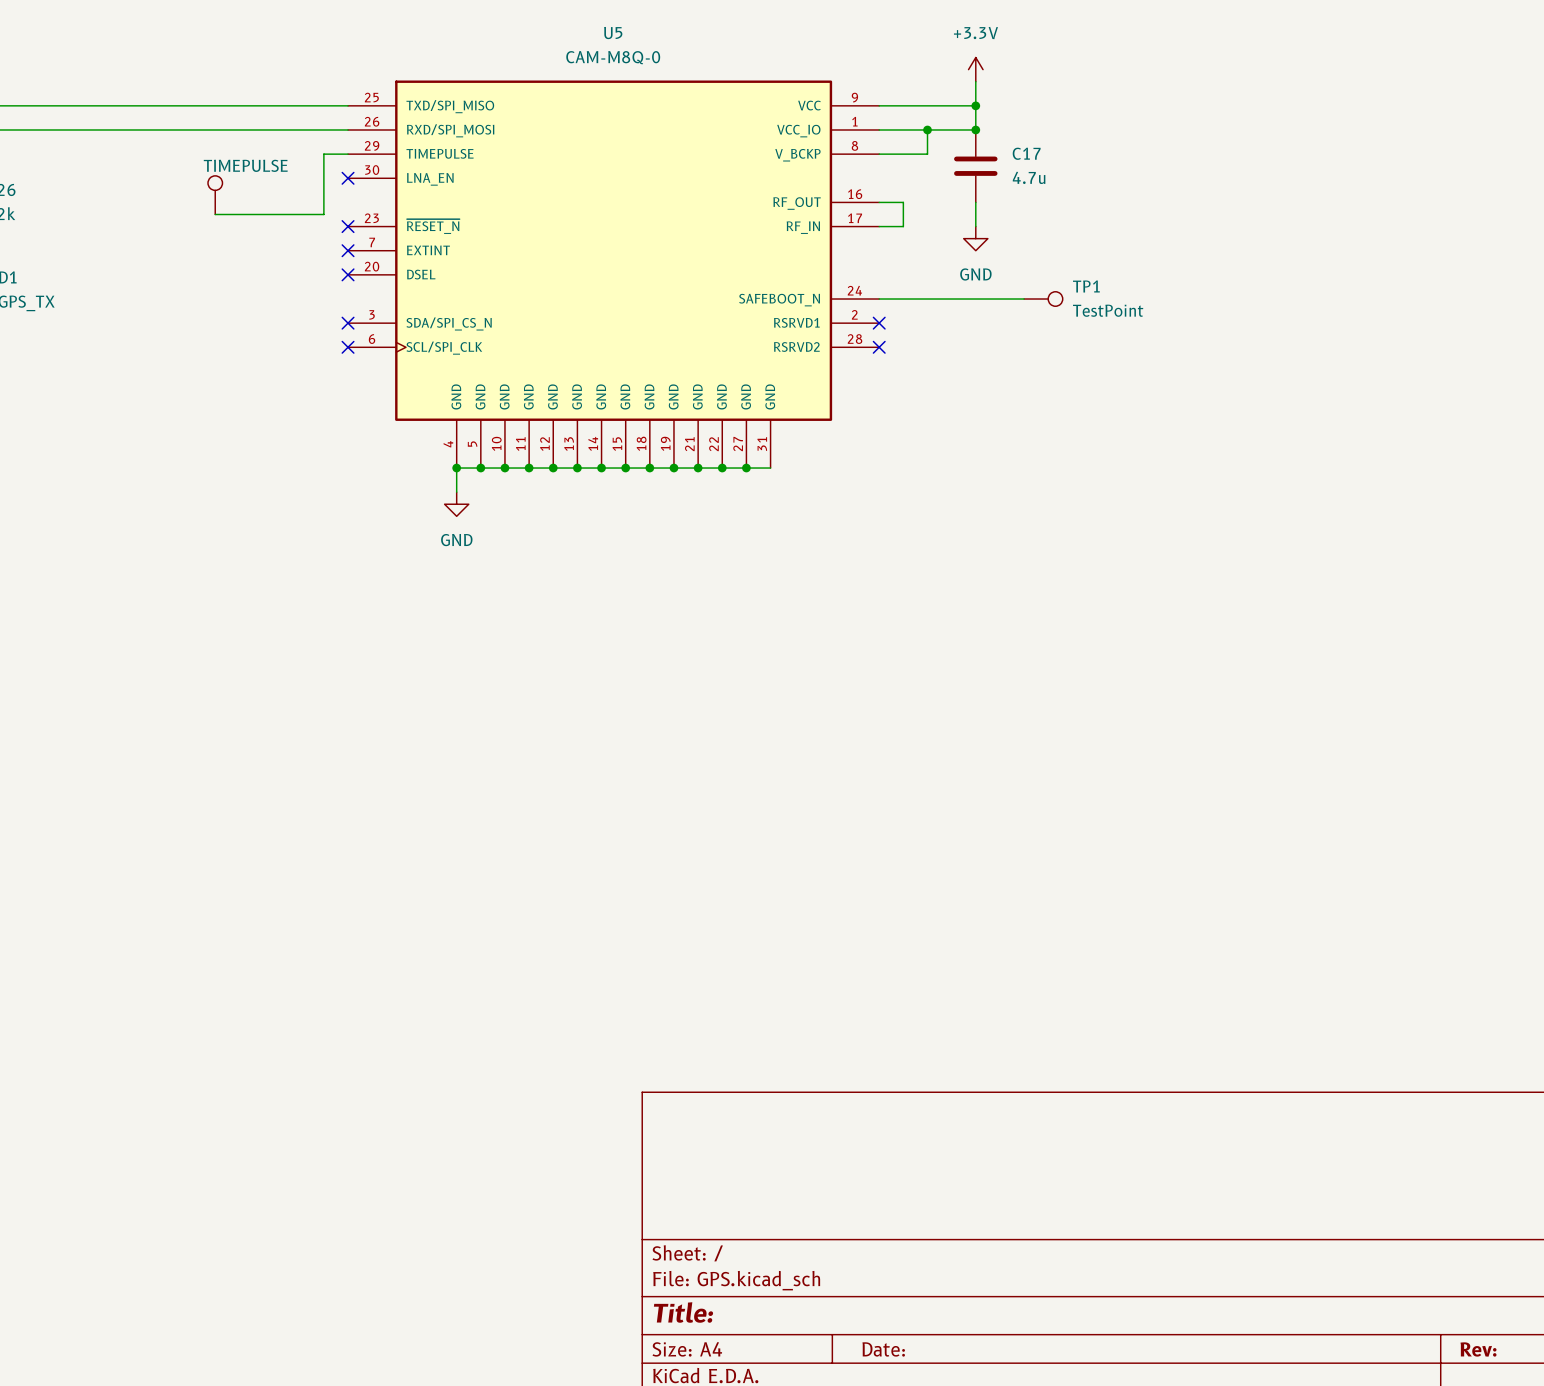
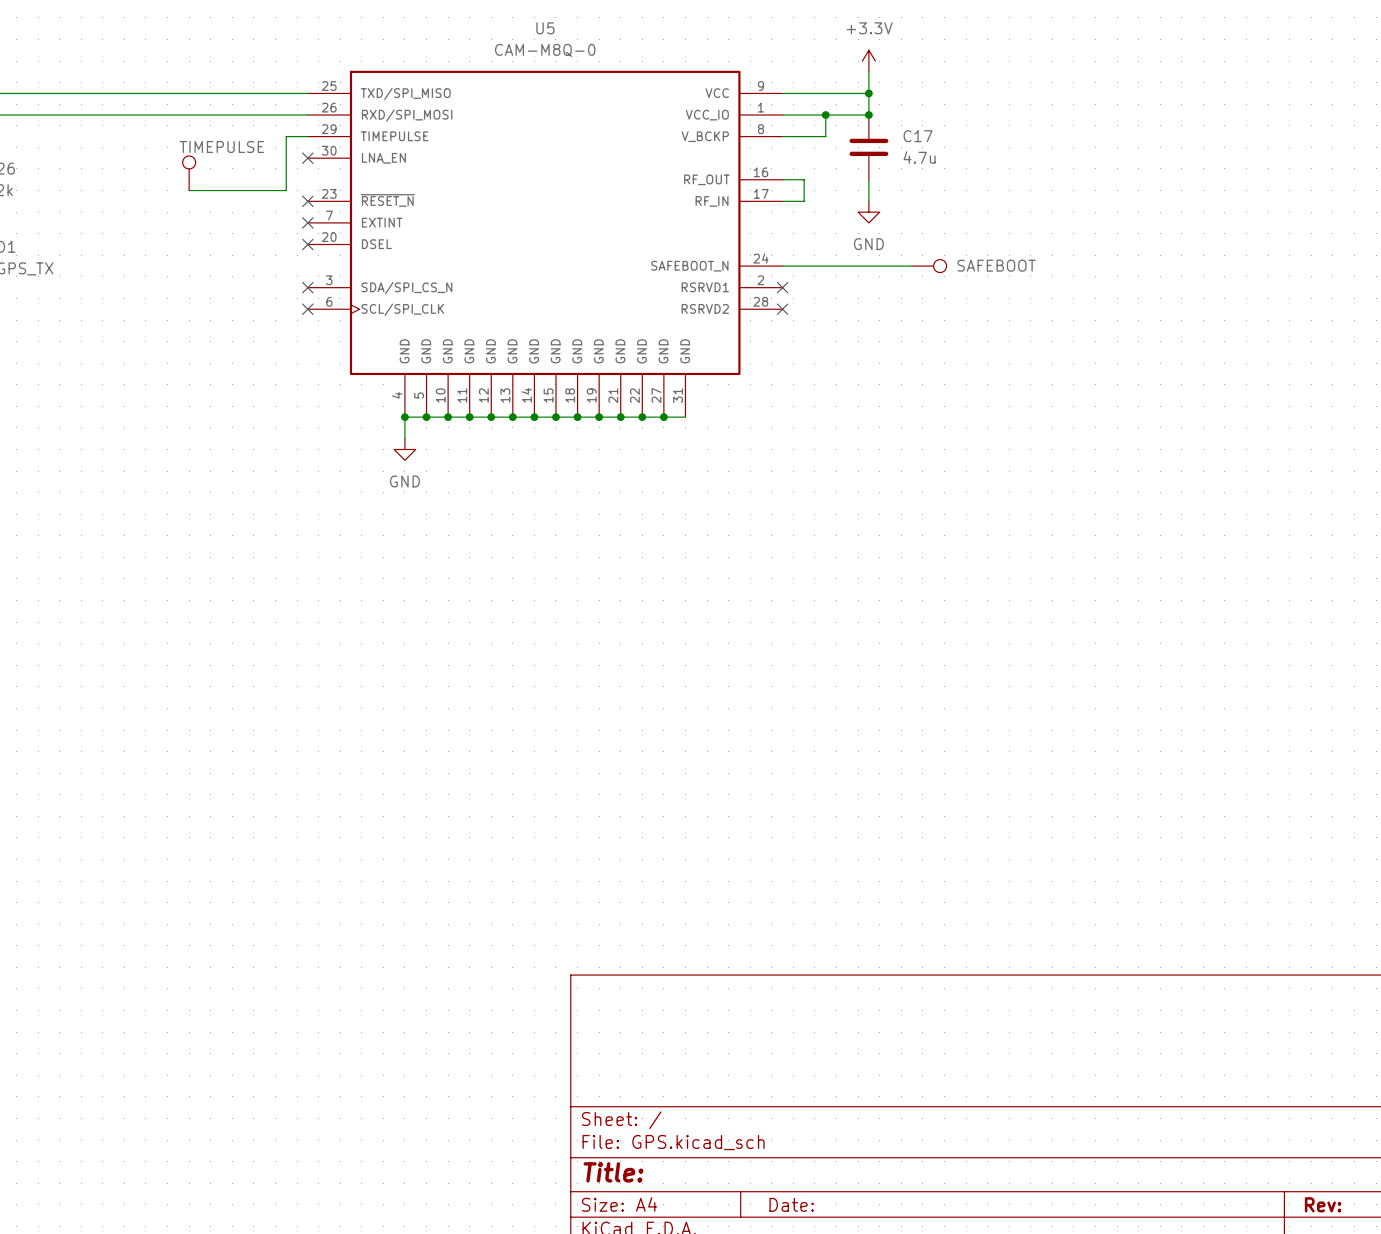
TP1 name: TP1 (1086, 286) -> none
TP1 value: TestPoint (1108, 310) -> SAFEBOOT (996, 265)

